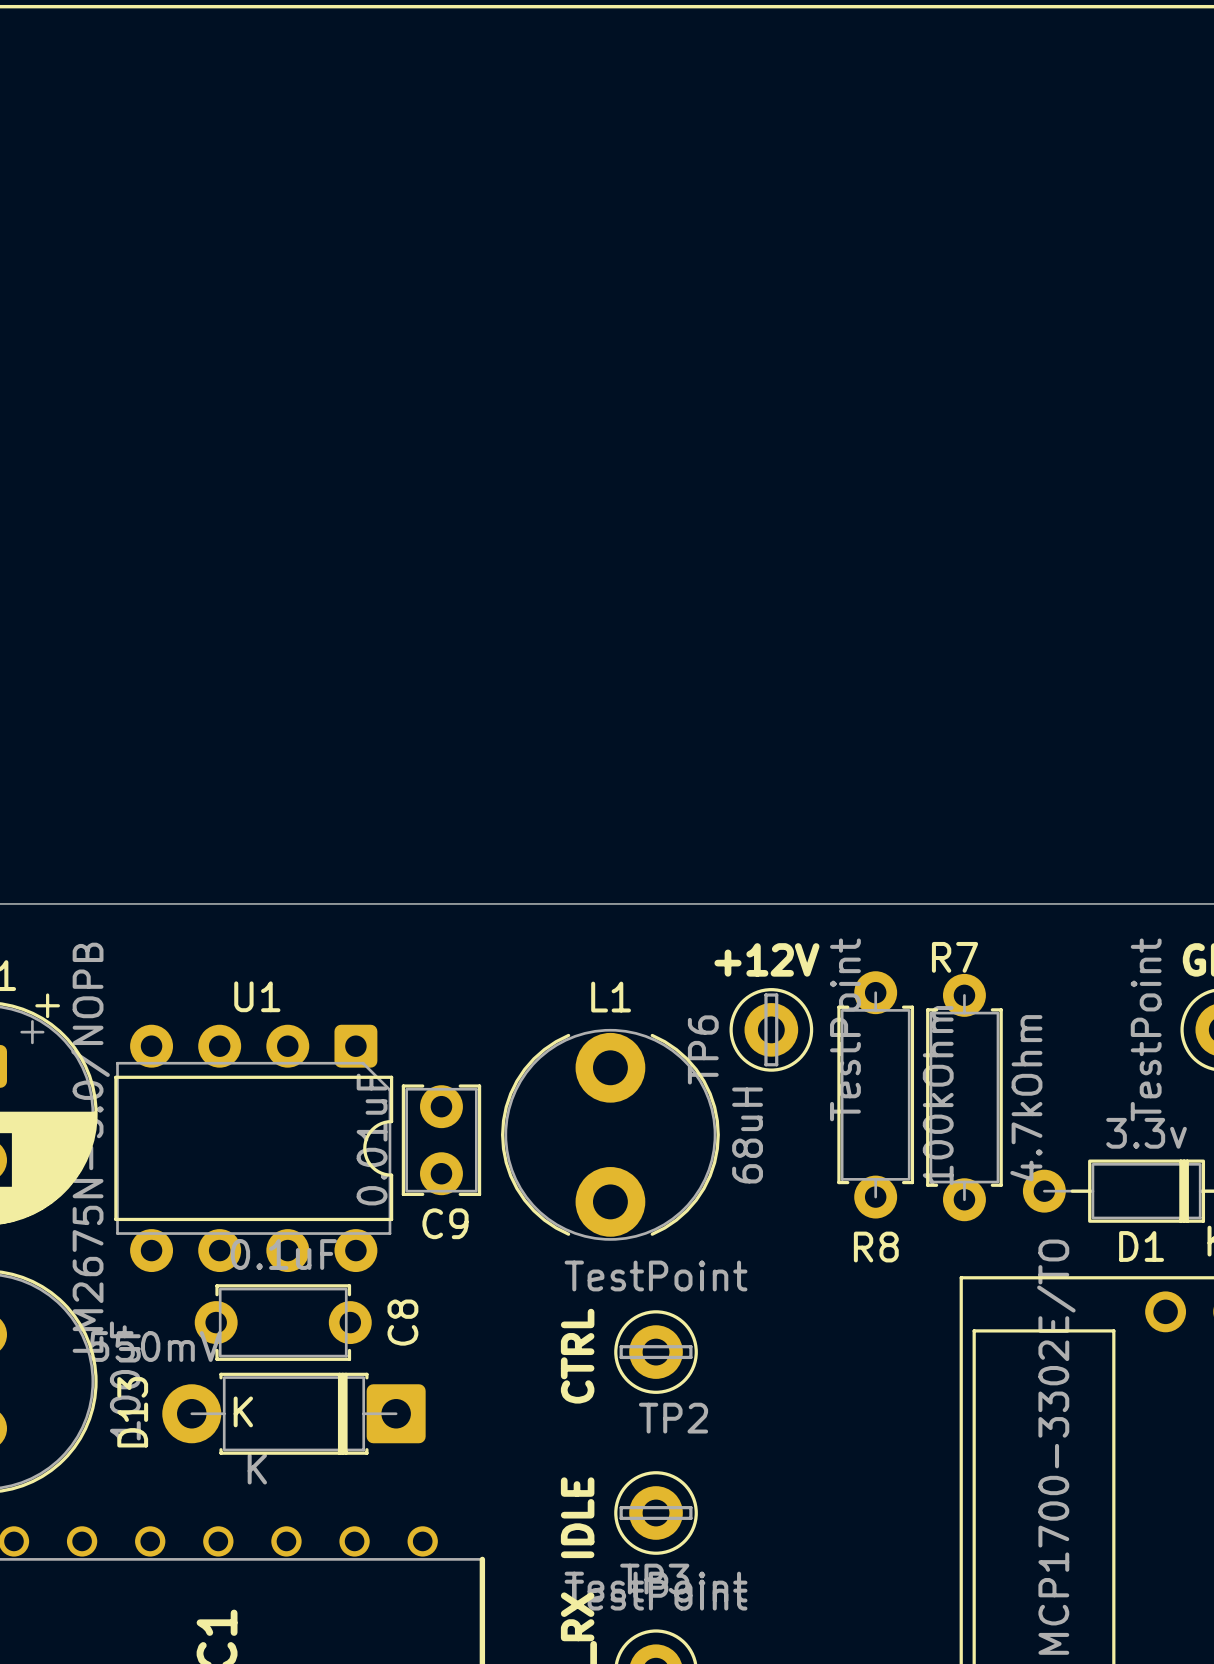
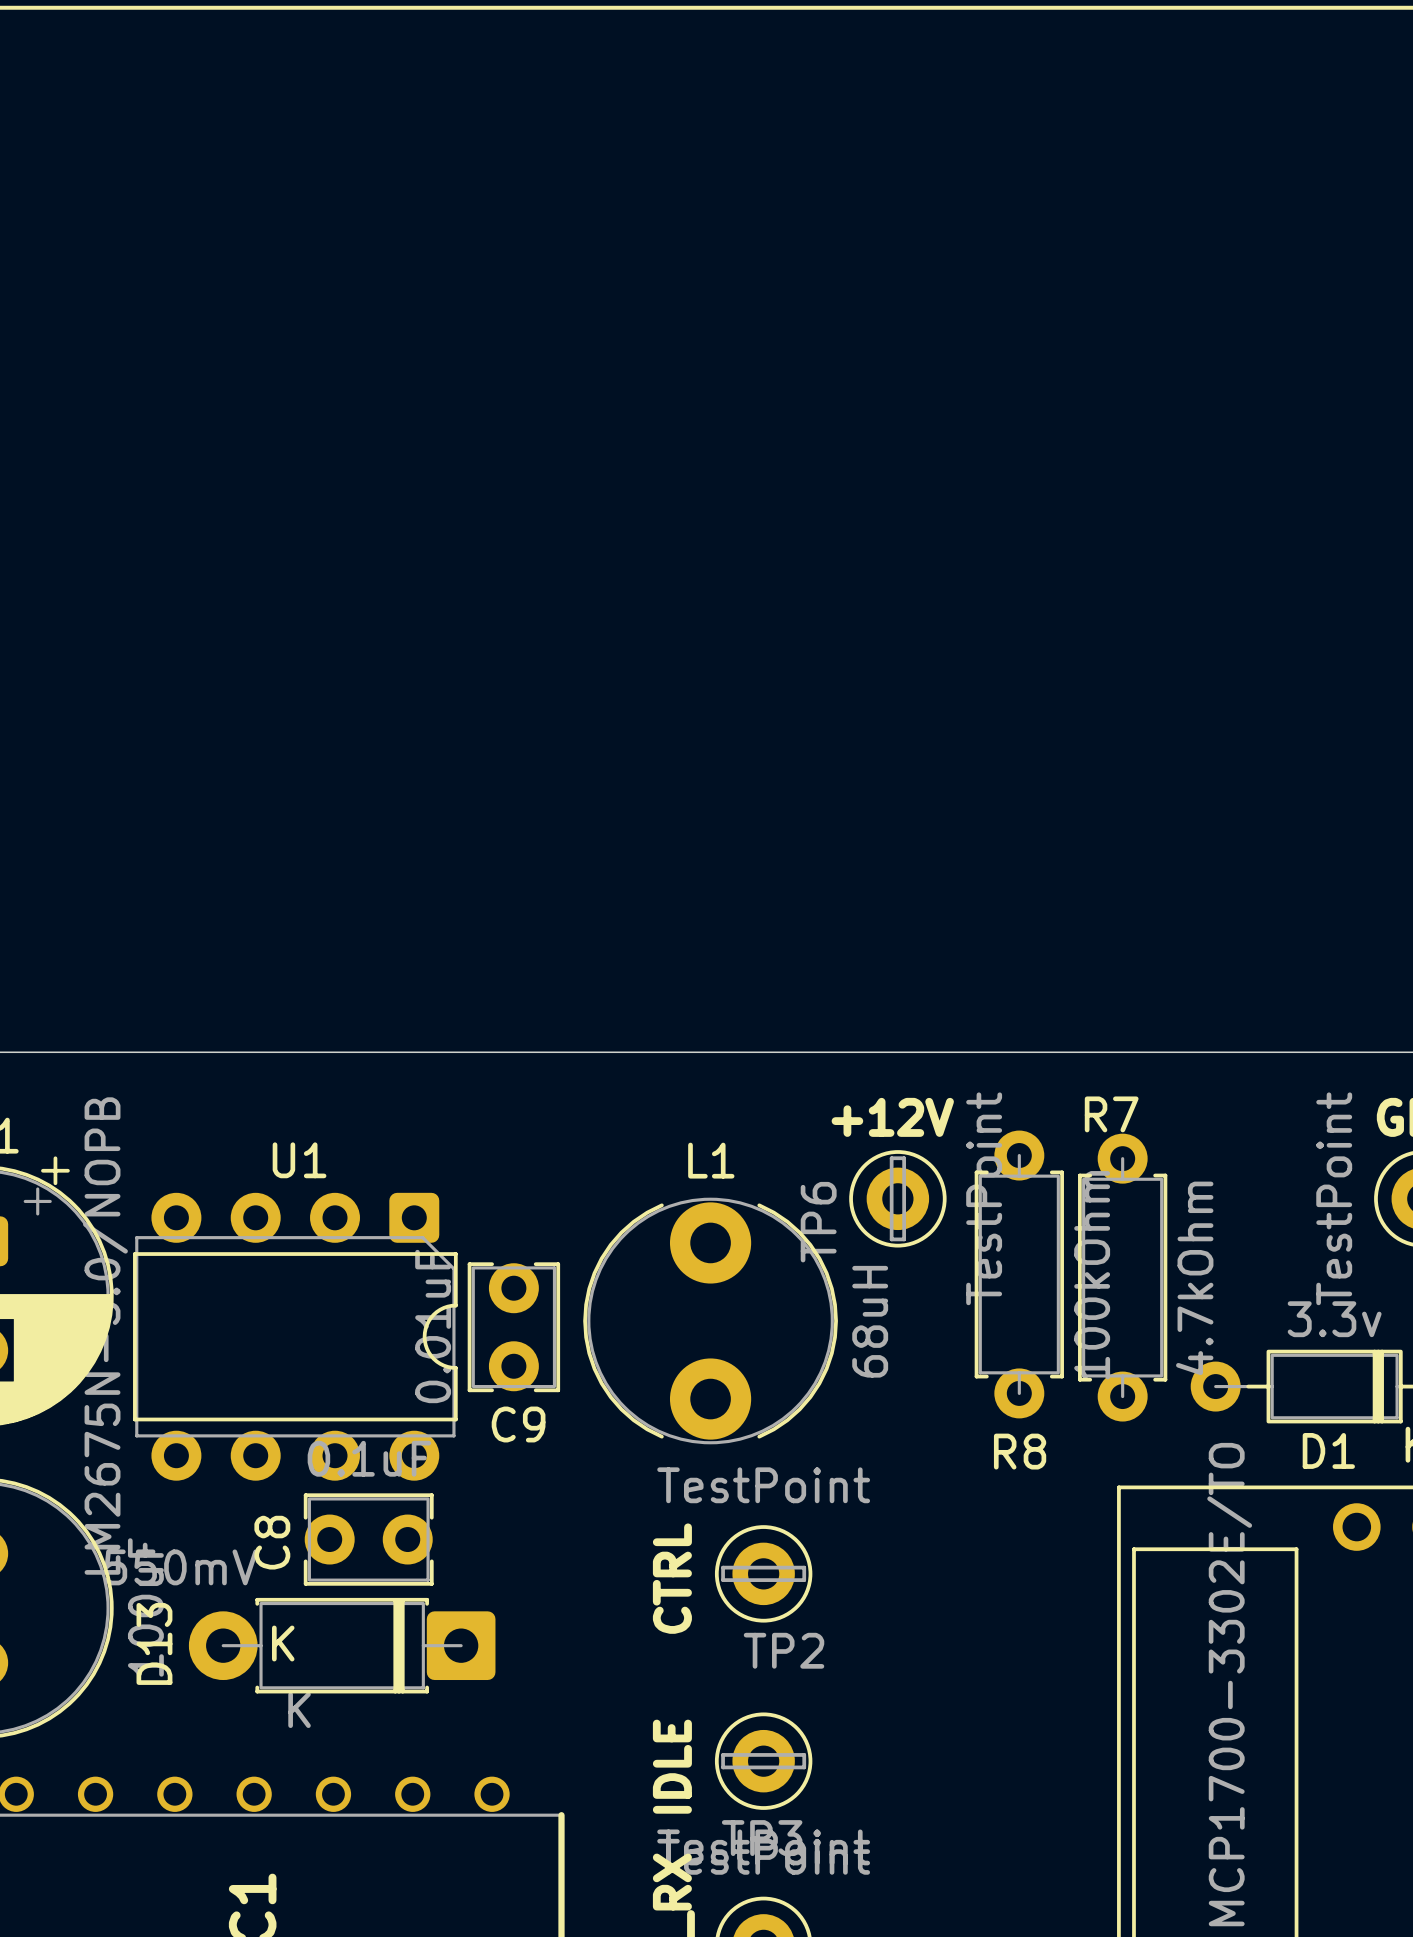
C8 footprint: [194, 1284, 372, 1361] -> [303, 1493, 434, 1586]
C8 name position: C8 (402, 1322) -> C8 (272, 1542)

